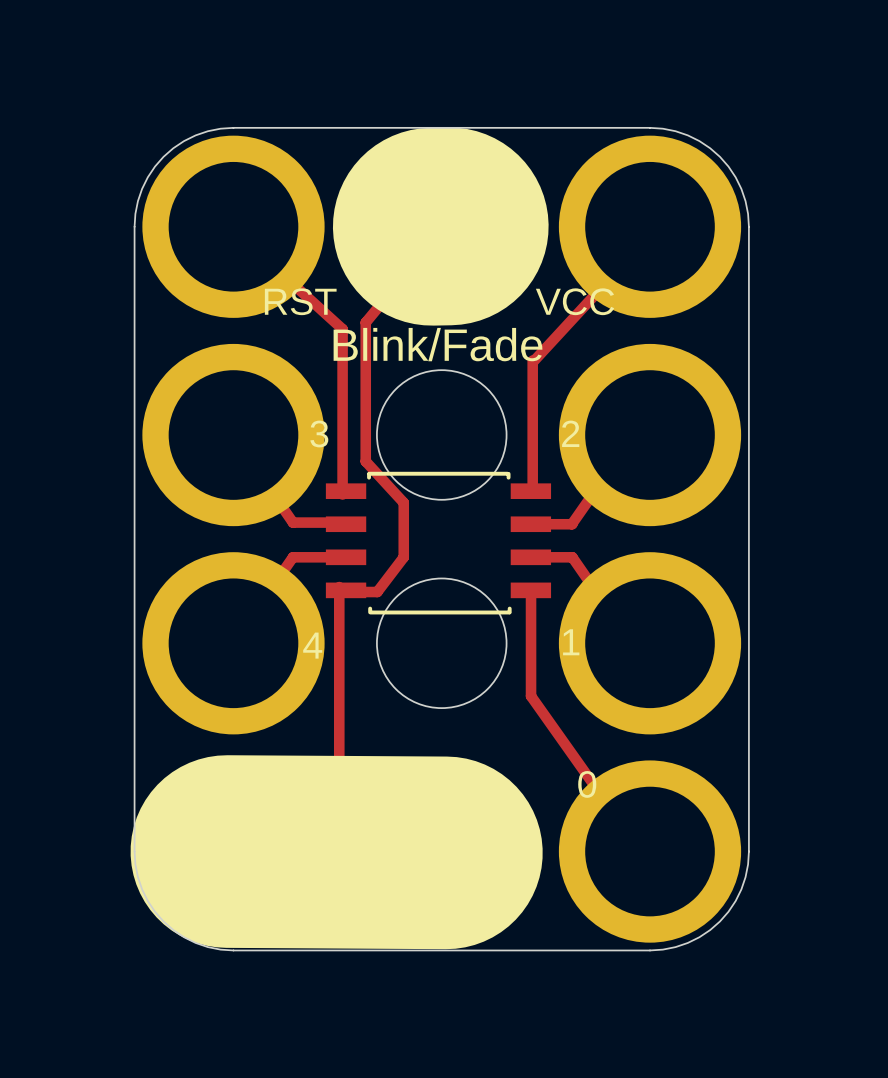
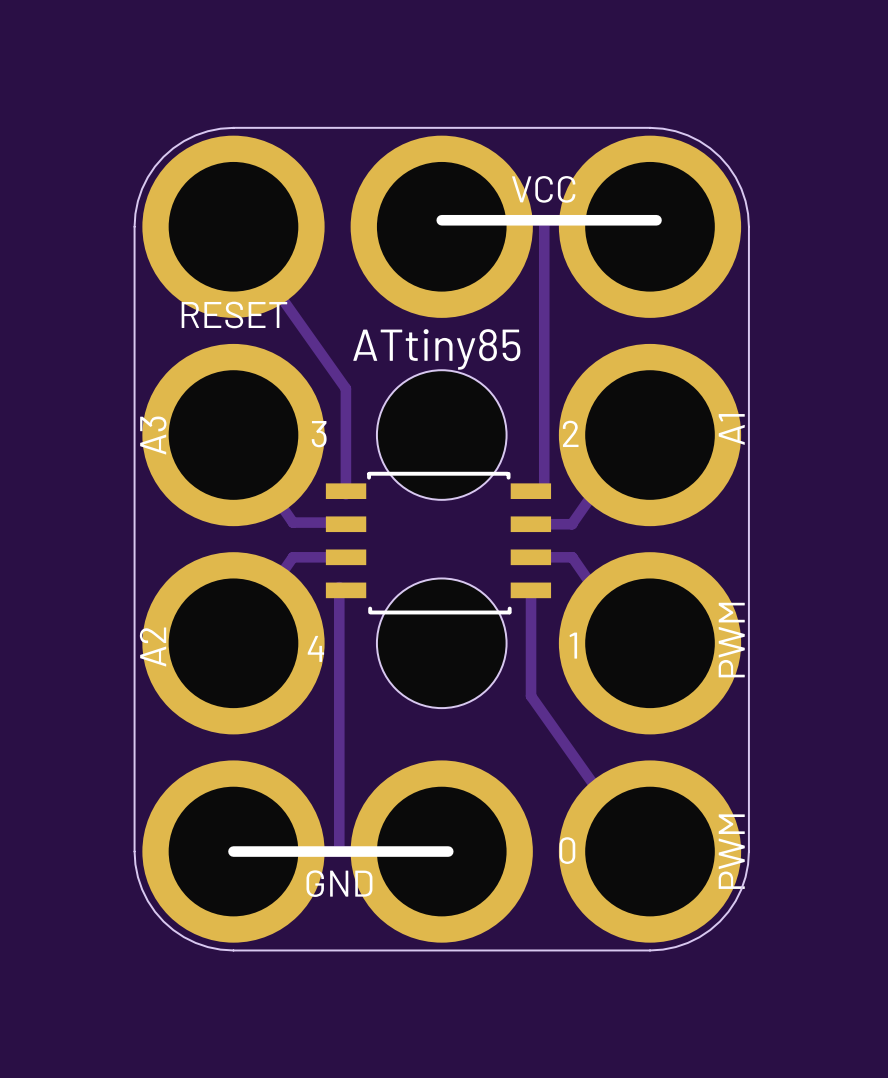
part footprint: [130, 127, 750, 952] -> [133, 127, 750, 952]

